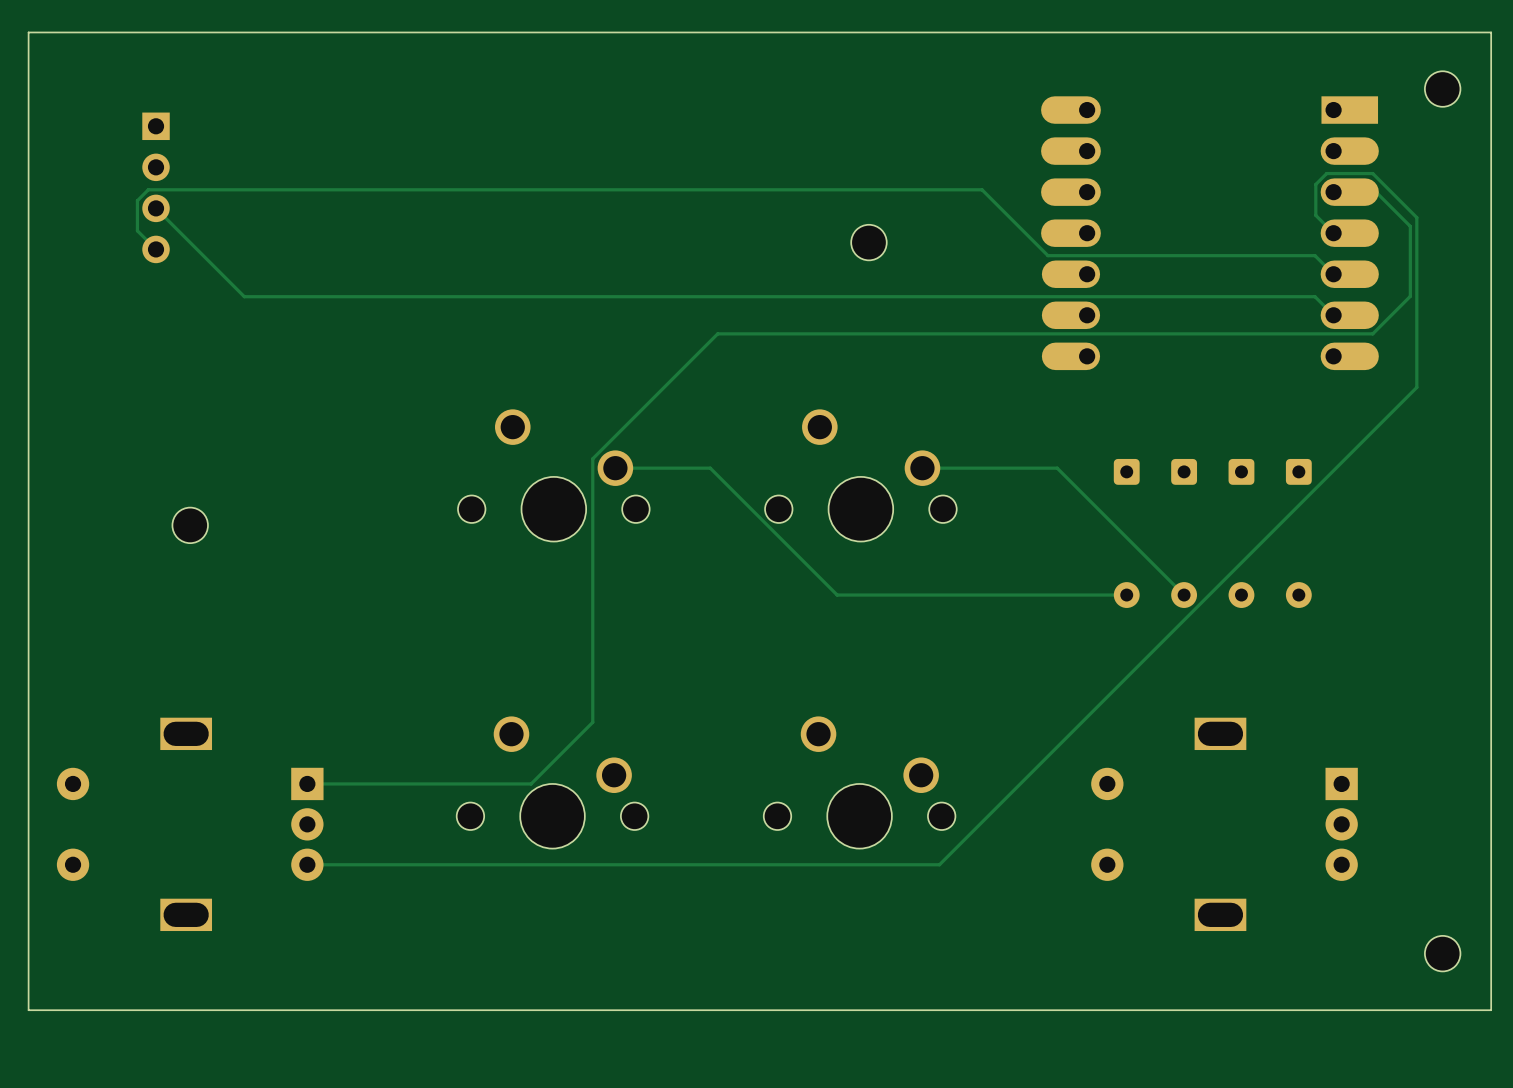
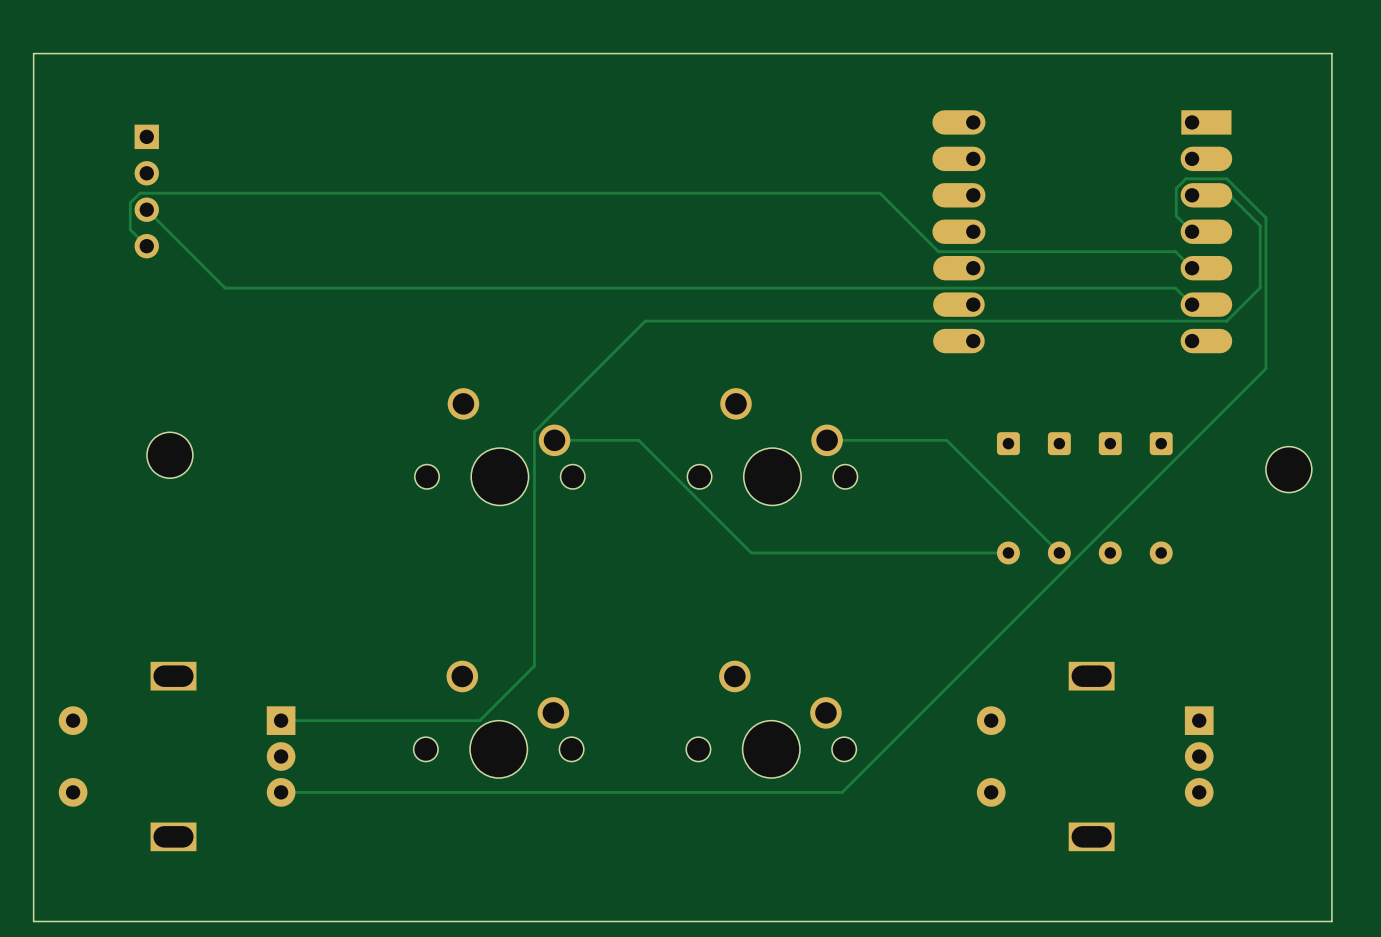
part: (1442, 89) -> none
part: (868, 242) -> none
part: none -> (169, 455)
part: none -> (1288, 469)
part: (190, 525) -> none
part: (1442, 953) -> none

